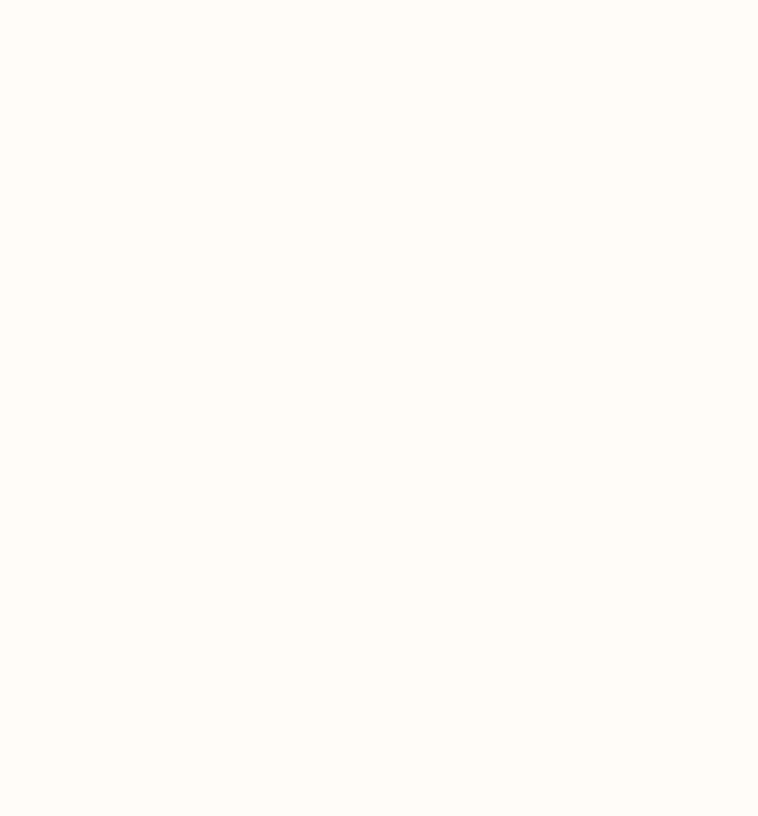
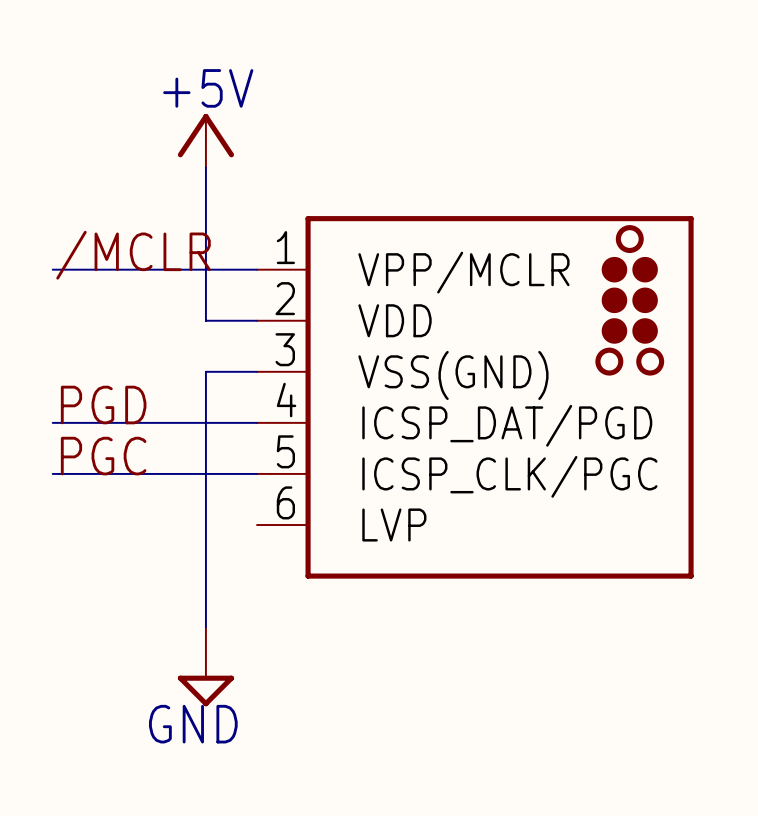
power symbol: none -> +5V (205, 140)
wire: none -> (205, 167) (205, 320) (257, 320)
label: none -> /MCLR (133, 255)
wire: none -> (52, 269) (257, 269)
wire: none -> (257, 371) (205, 371) (205, 627)
part: none -> (475, 397)
label: none -> PGD (103, 405)
wire: none -> (52, 422) (257, 422)
label: none -> PGC (103, 456)
wire: none -> (52, 473) (257, 473)
power symbol: none -> GND (205, 666)

